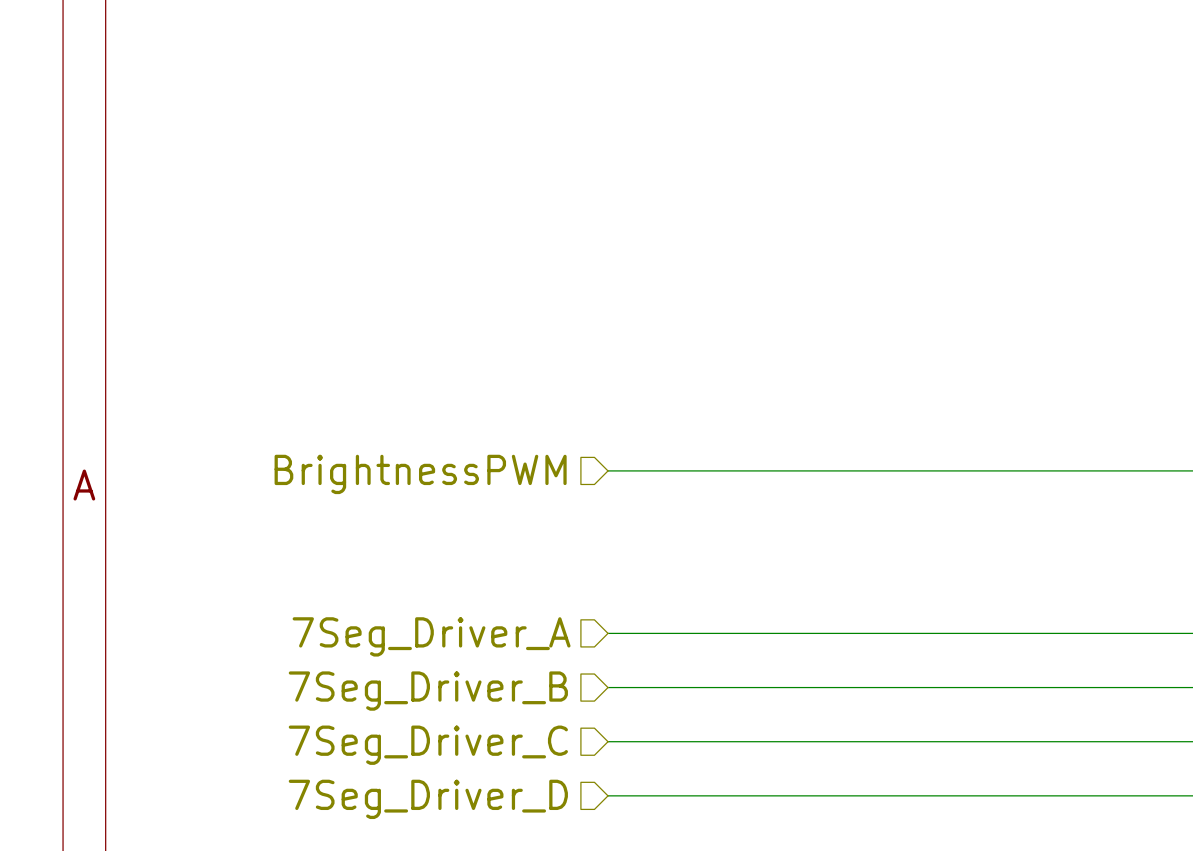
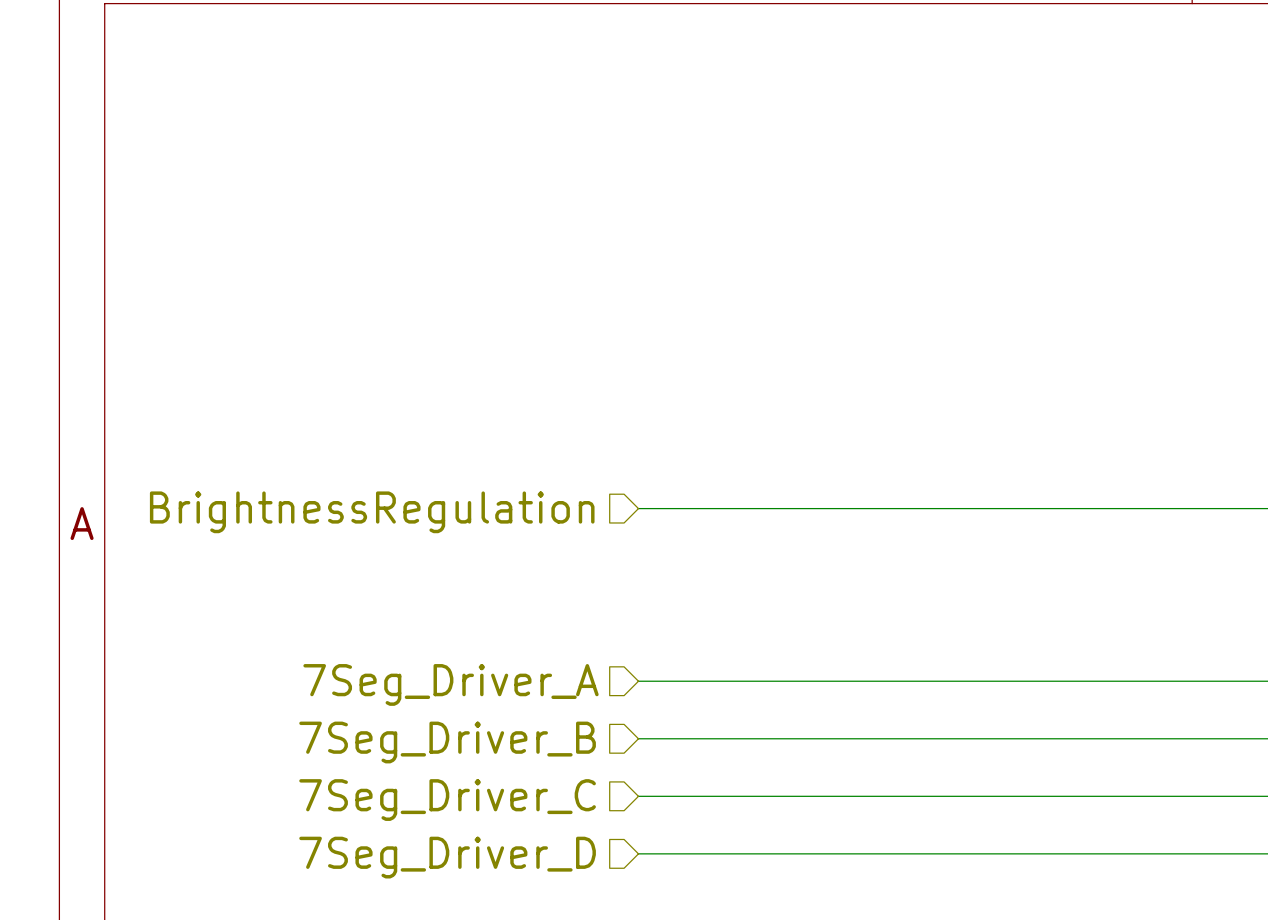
hierarchical label: BrightnessPWM (420, 474) -> BrightnessRegulation (372, 512)

